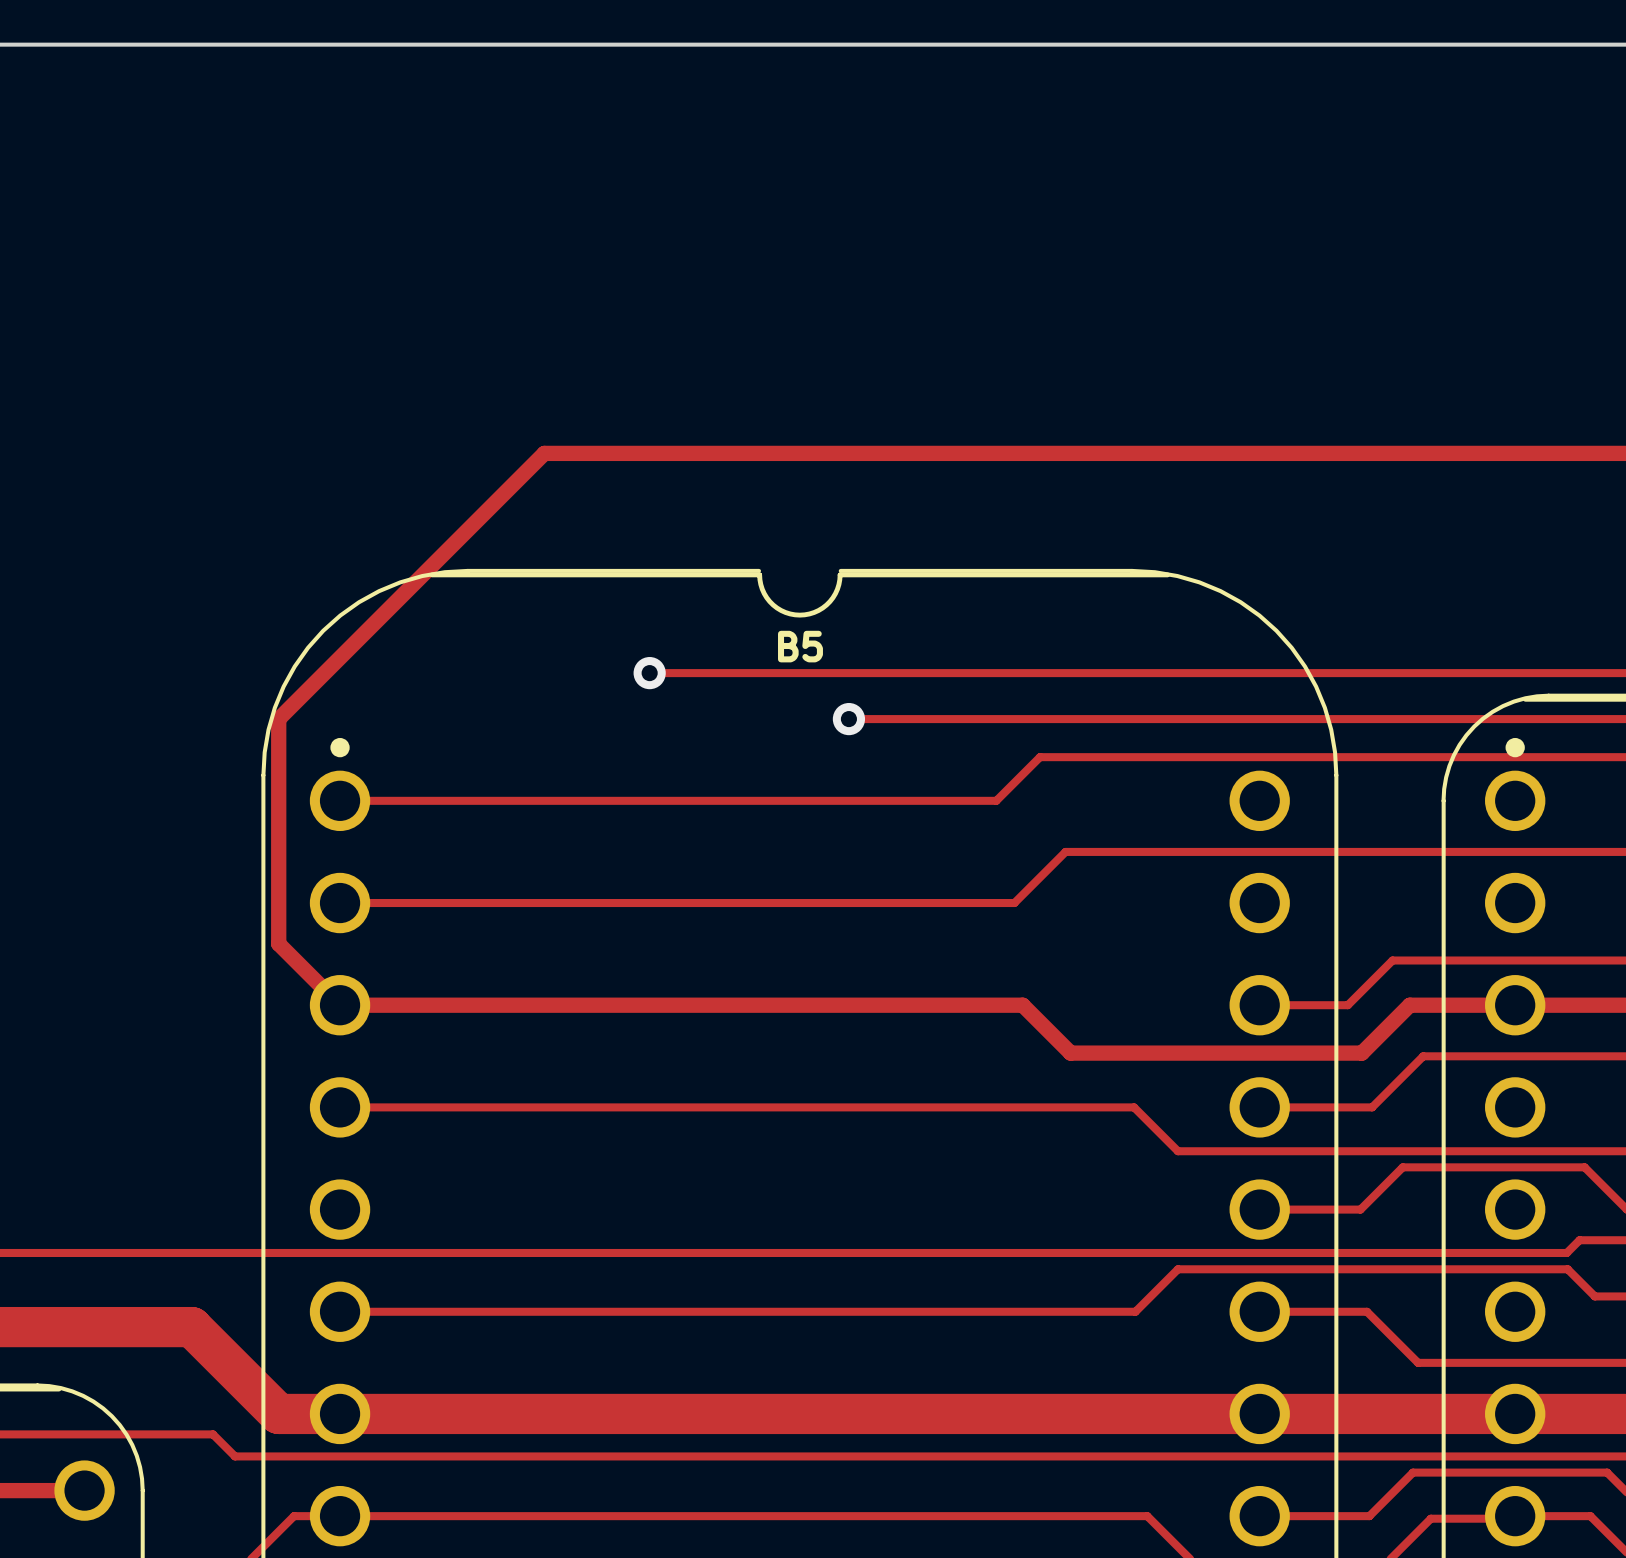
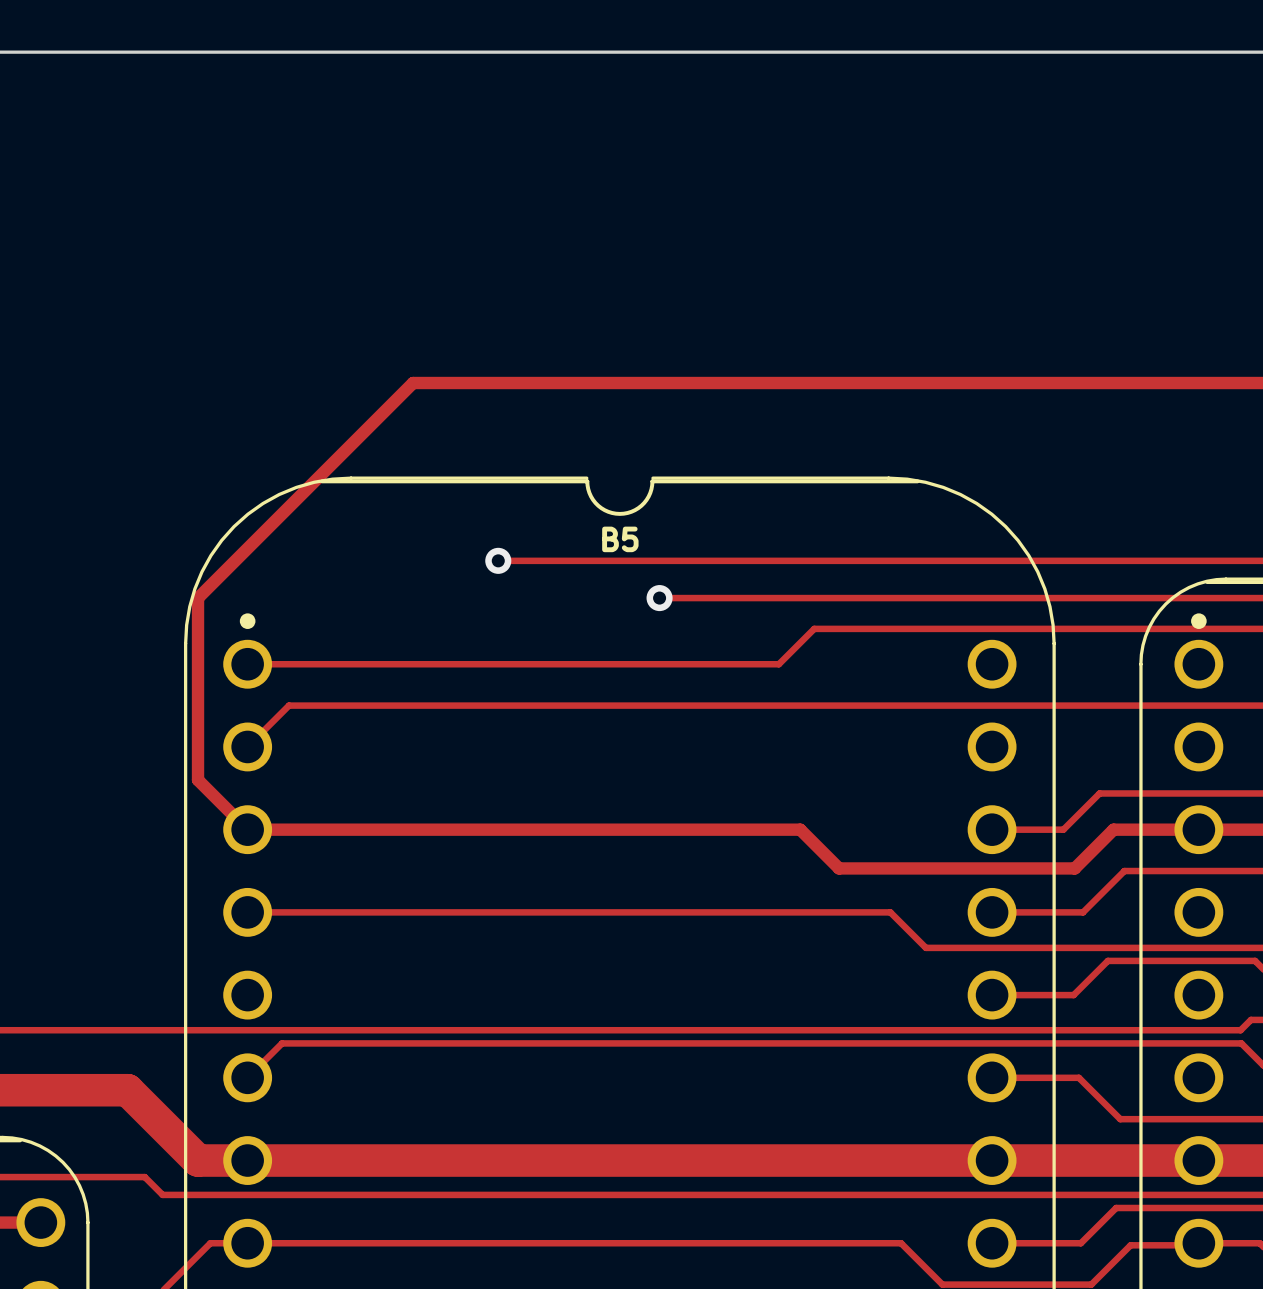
track: (1065, 851) (1014, 903) (340, 903) -> (834, 705) (289, 705) (247, 746)
track: (1177, 1269) (1135, 1311) (340, 1311) -> (925, 1043) (282, 1043) (247, 1077)

